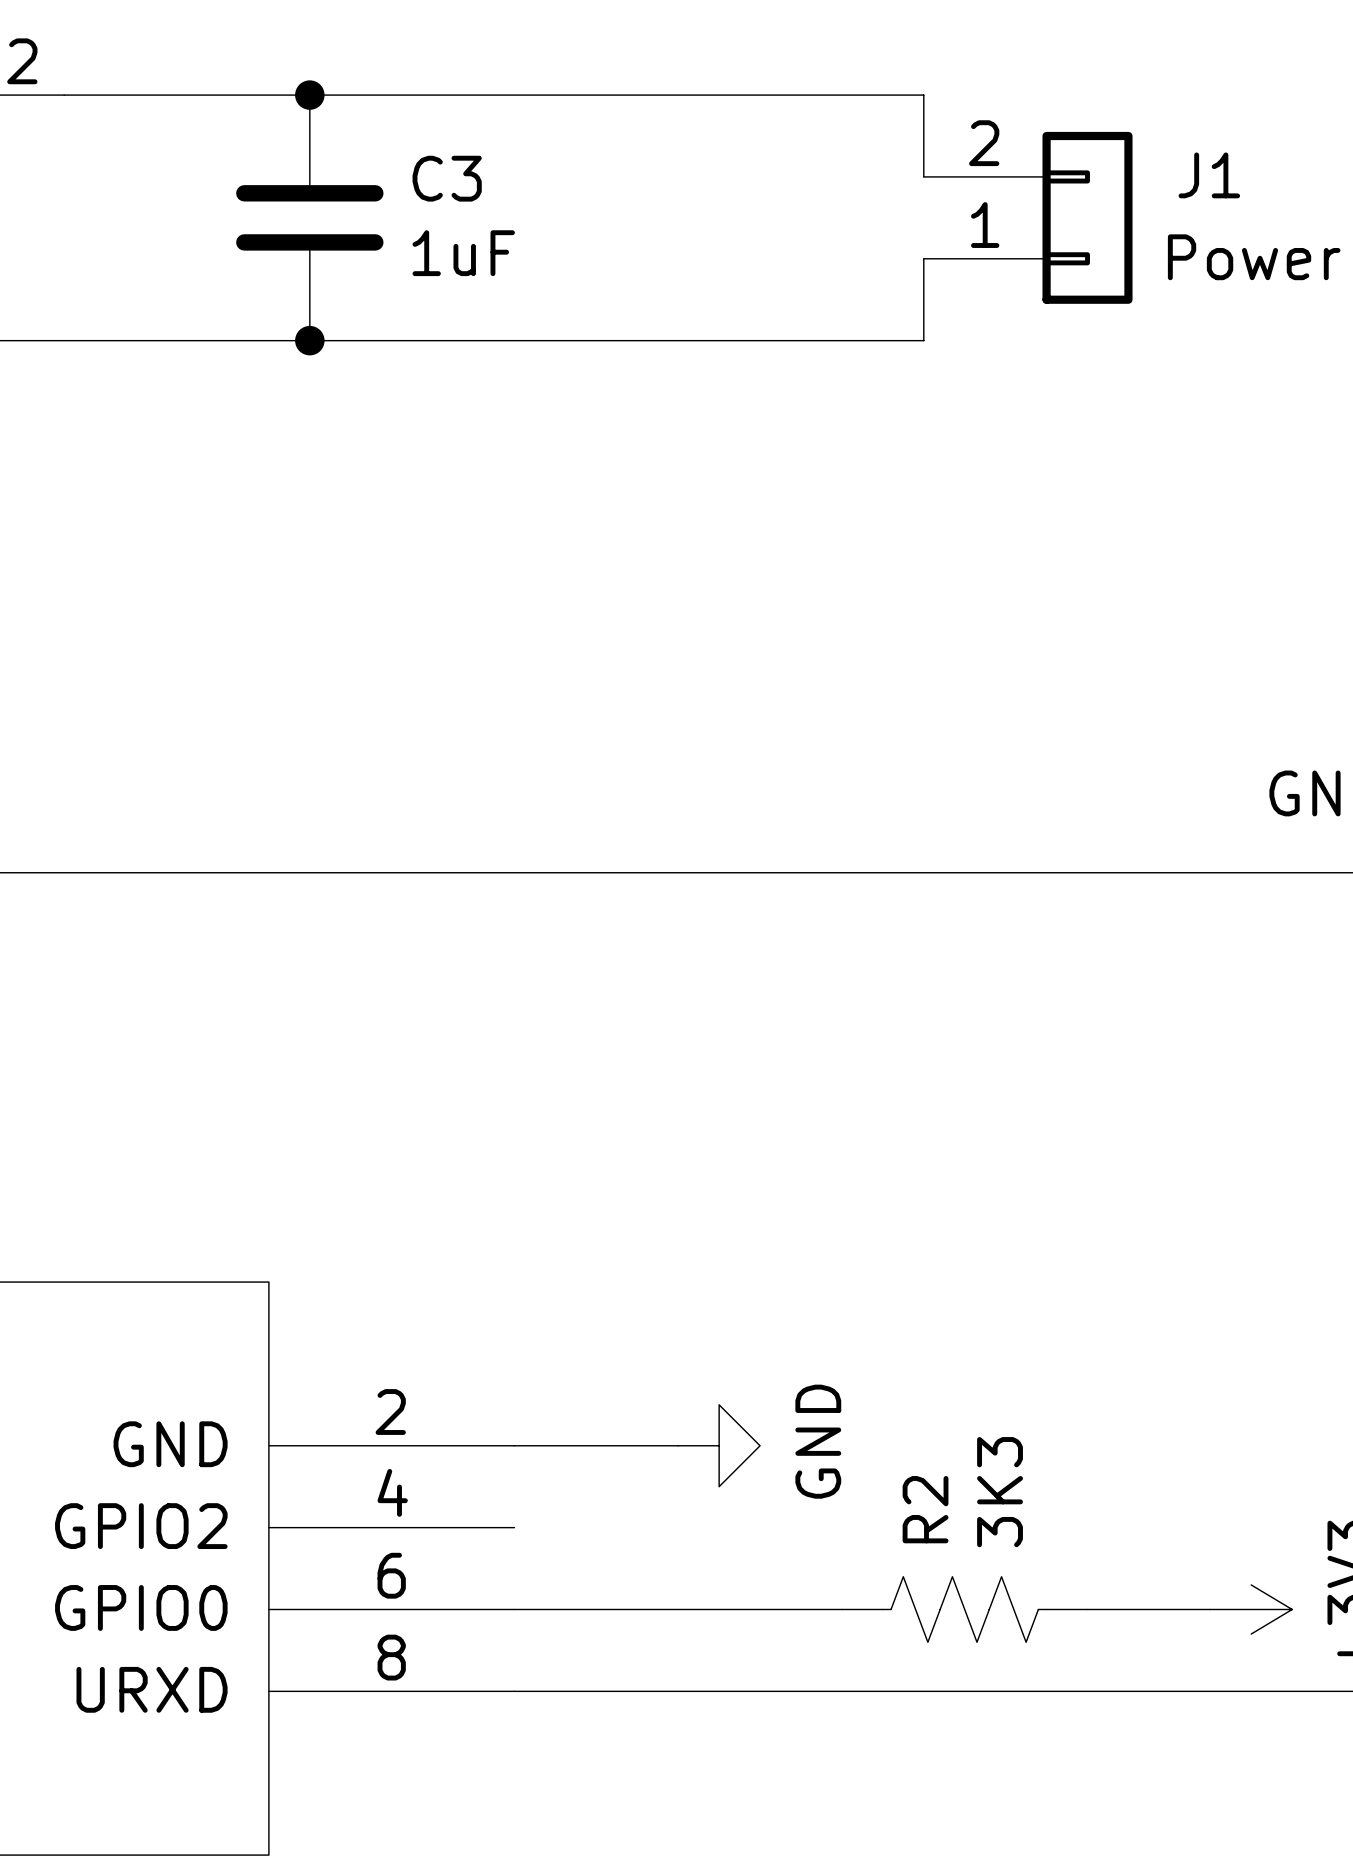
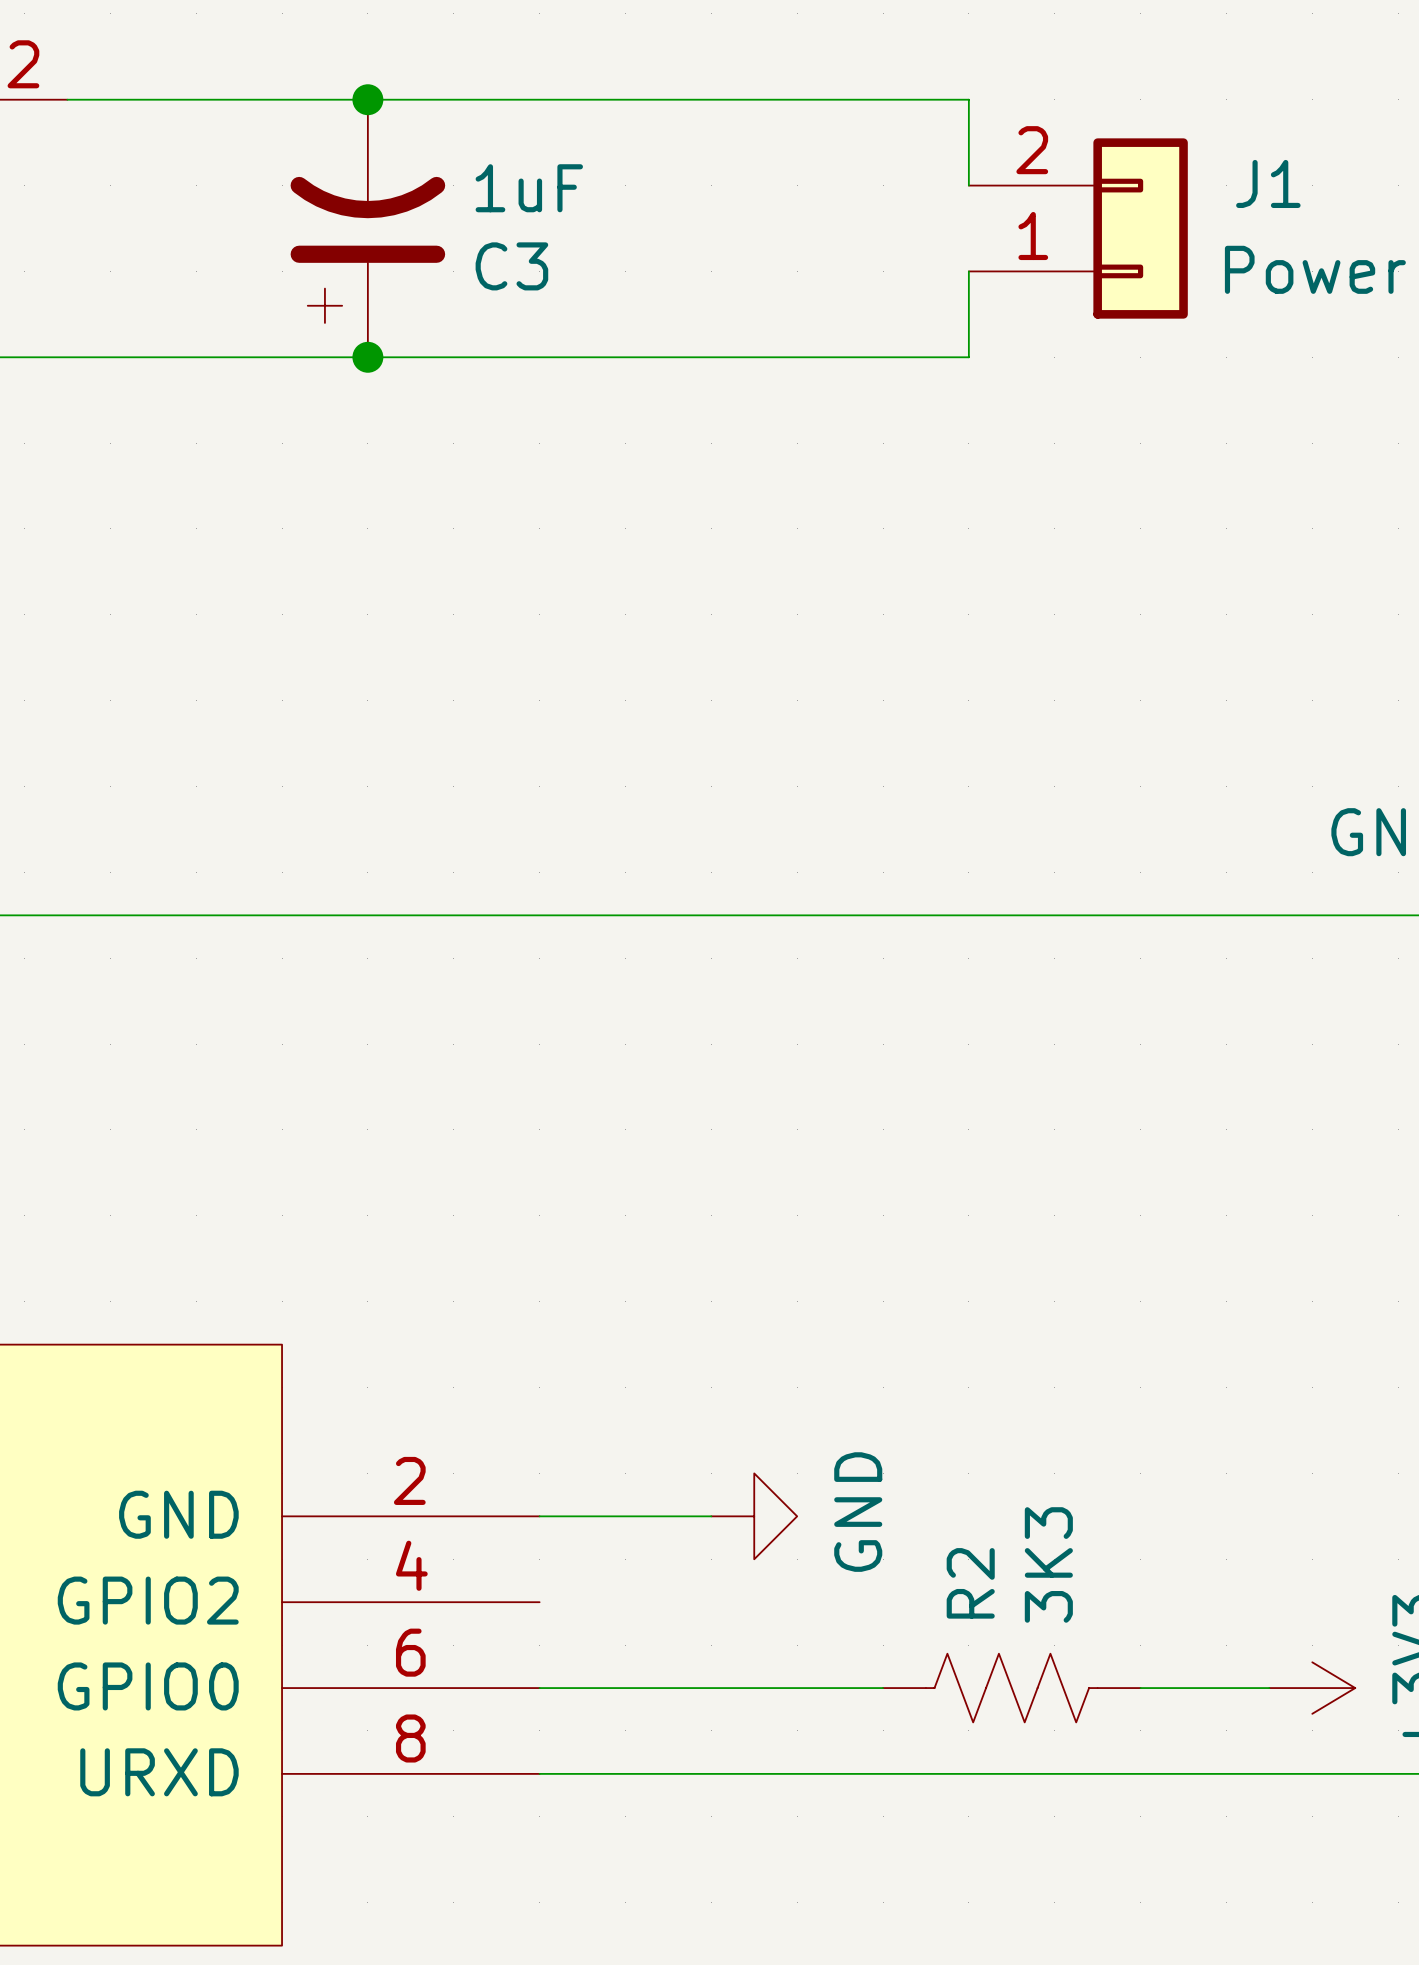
C3 symbol: [236, 95, 384, 341] -> [290, 99, 446, 358]
junction position: (309, 95) -> (367, 99)
C3 name position: C3 (447, 178) -> C3 (511, 266)
C3 value position: 1uF (463, 253) -> 1uF (529, 188)
junction position: (309, 340) -> (367, 357)

